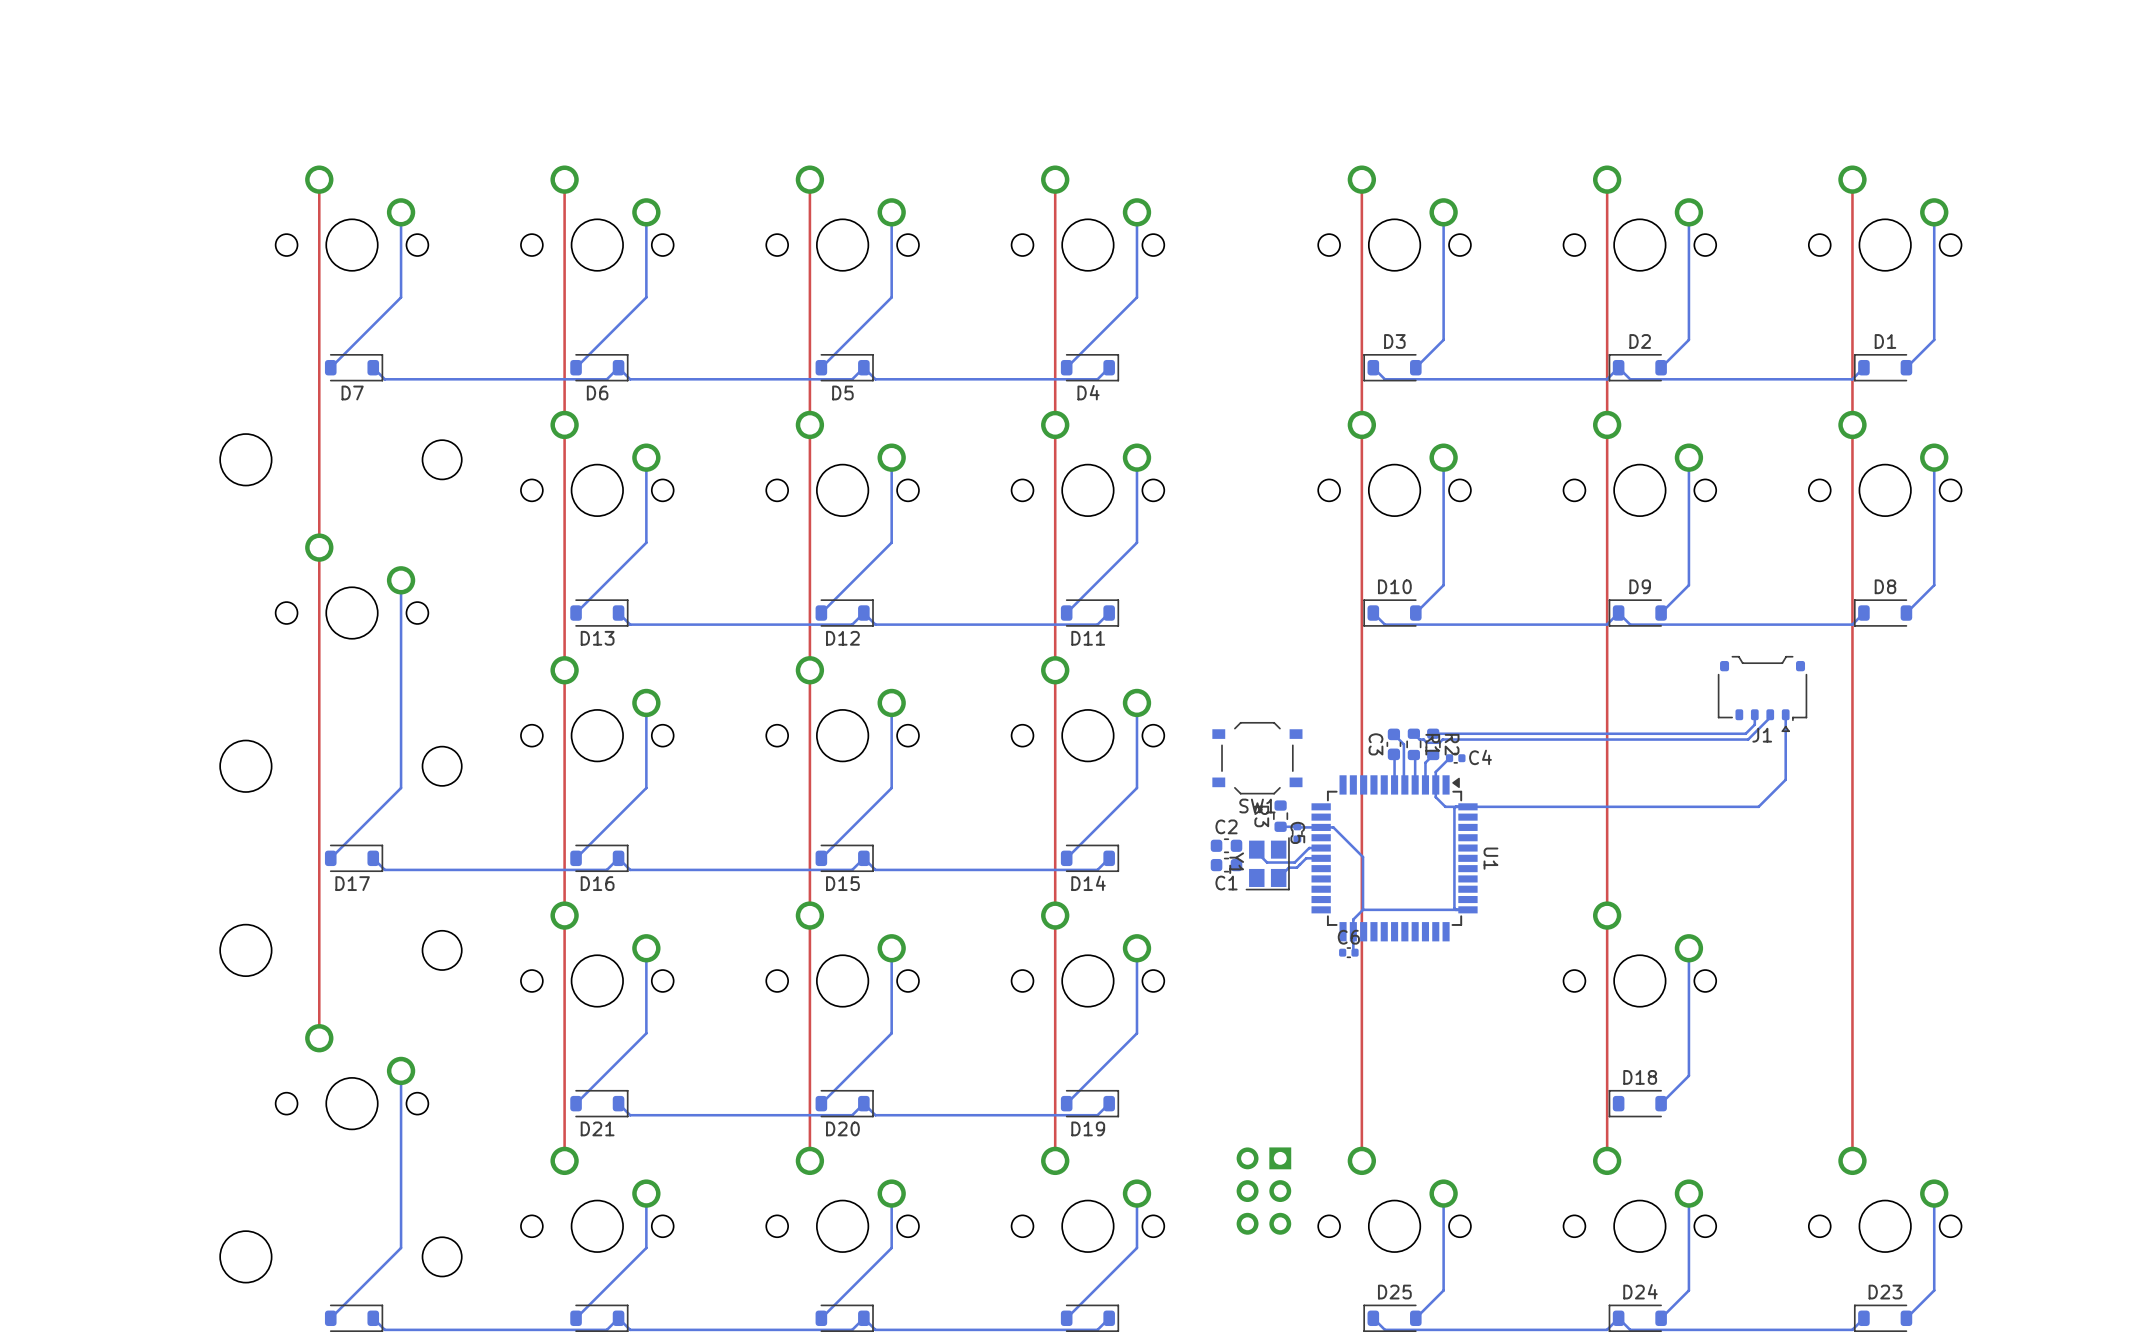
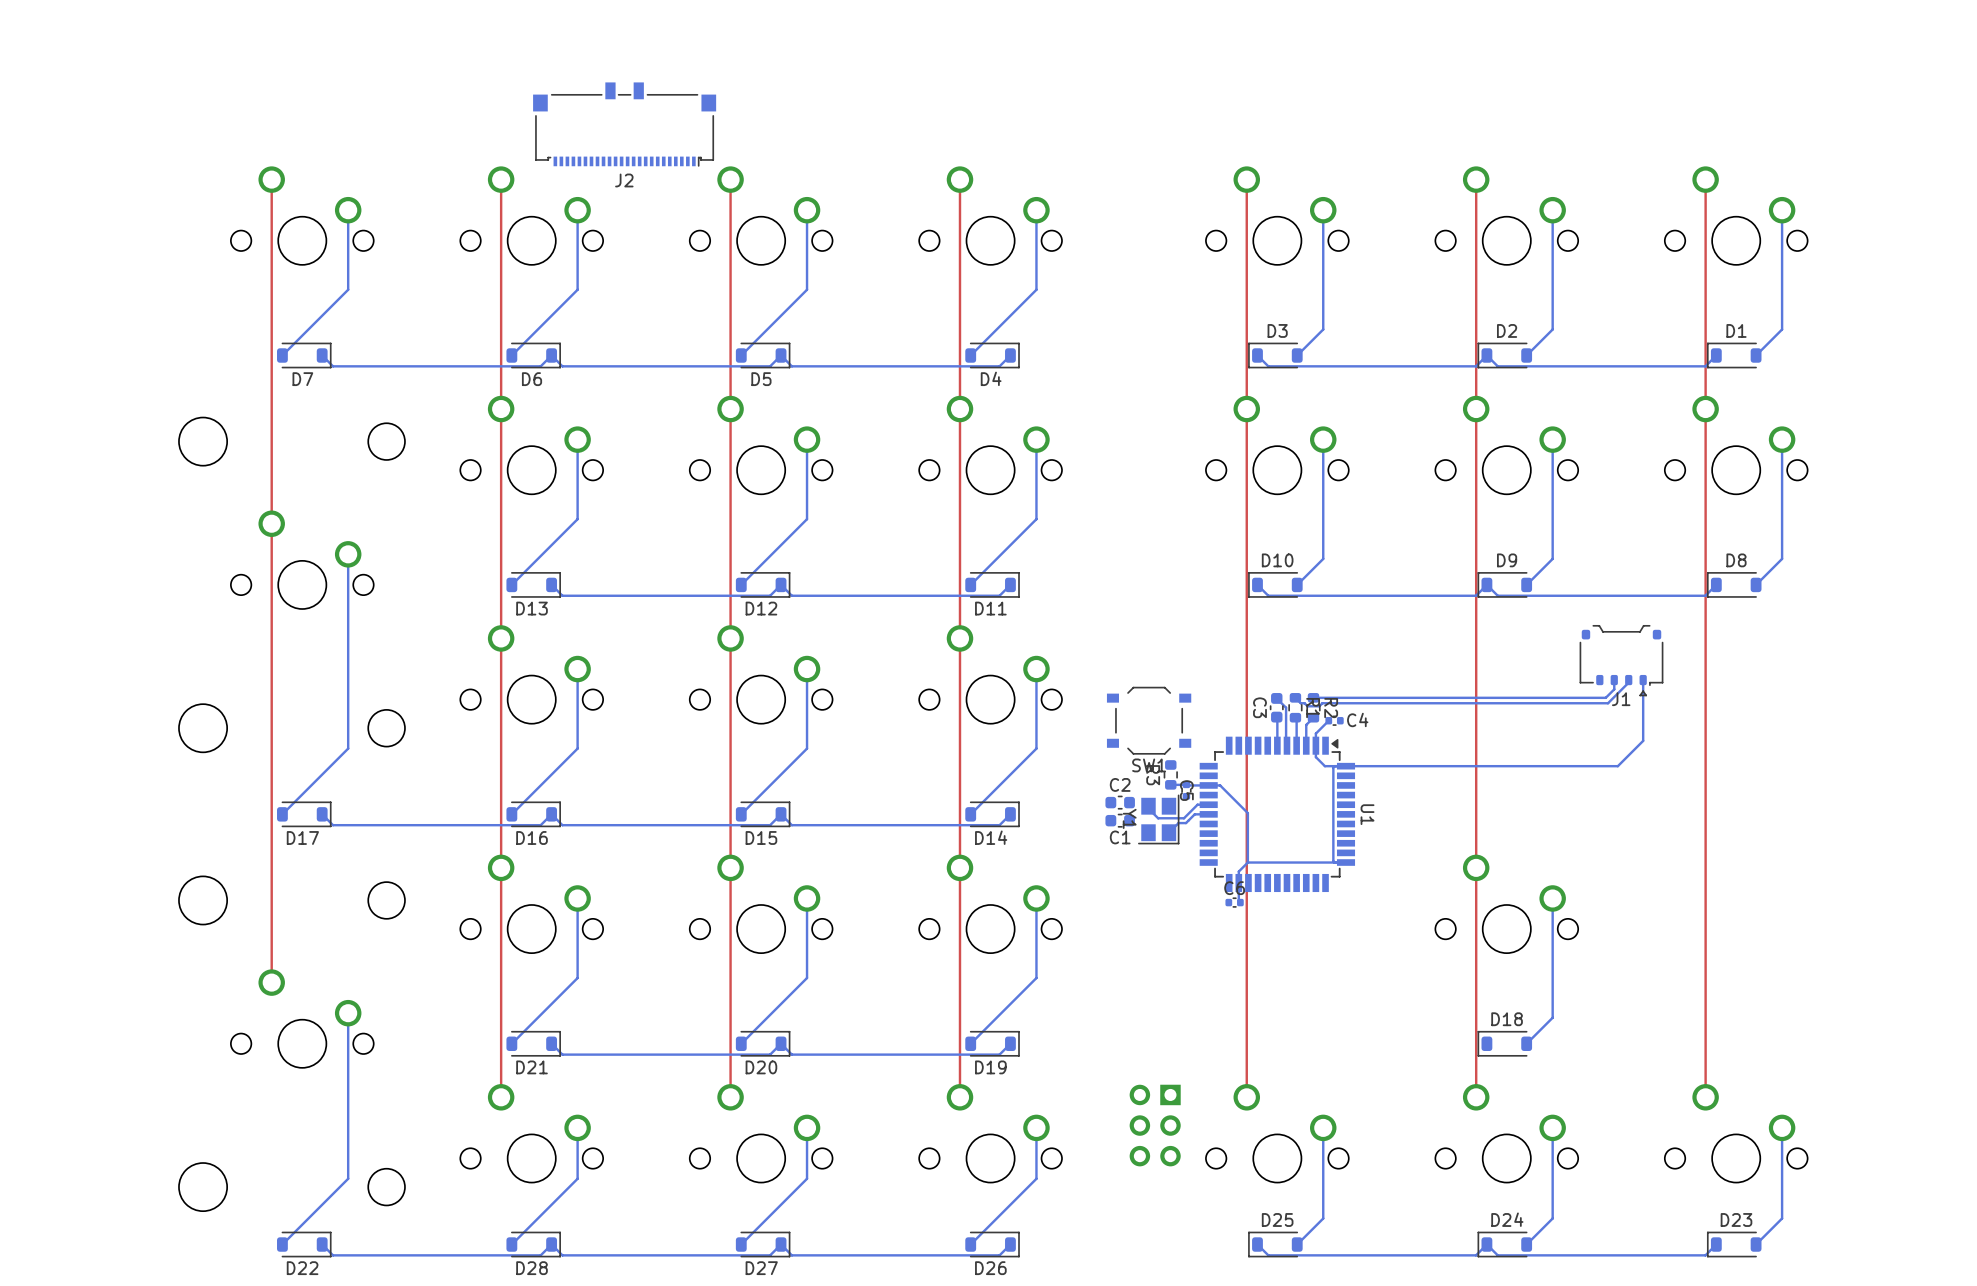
J2: none -> (624, 124)

